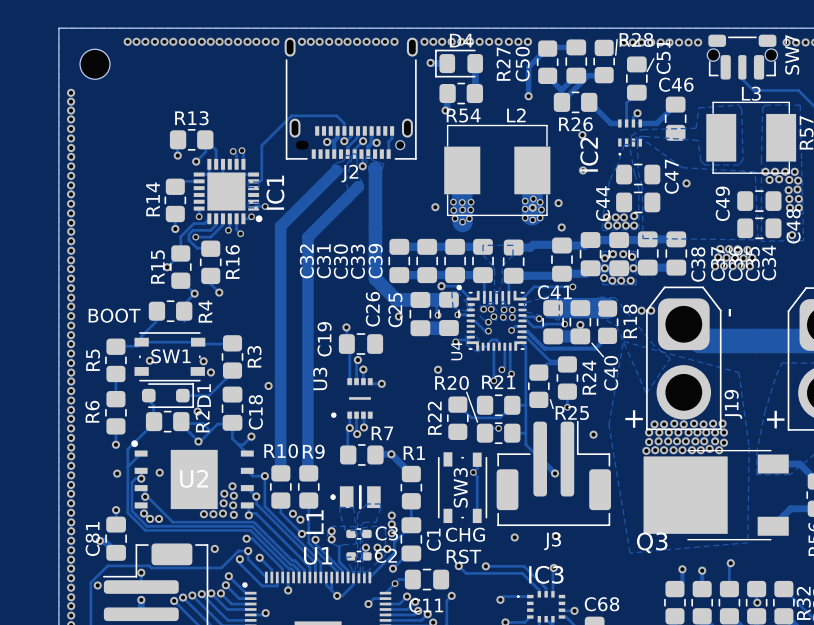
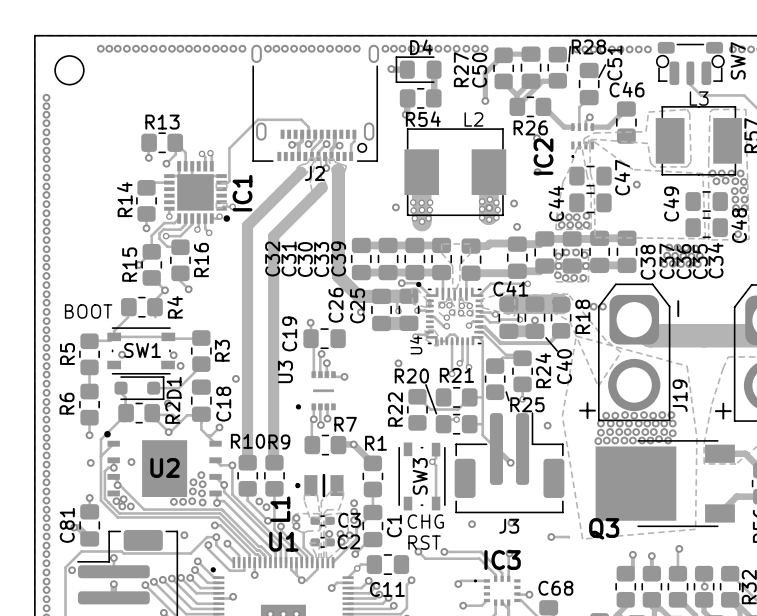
via: none -> (123, 499)
track: none -> (551, 537) (568, 537)
via: none -> (551, 537)

